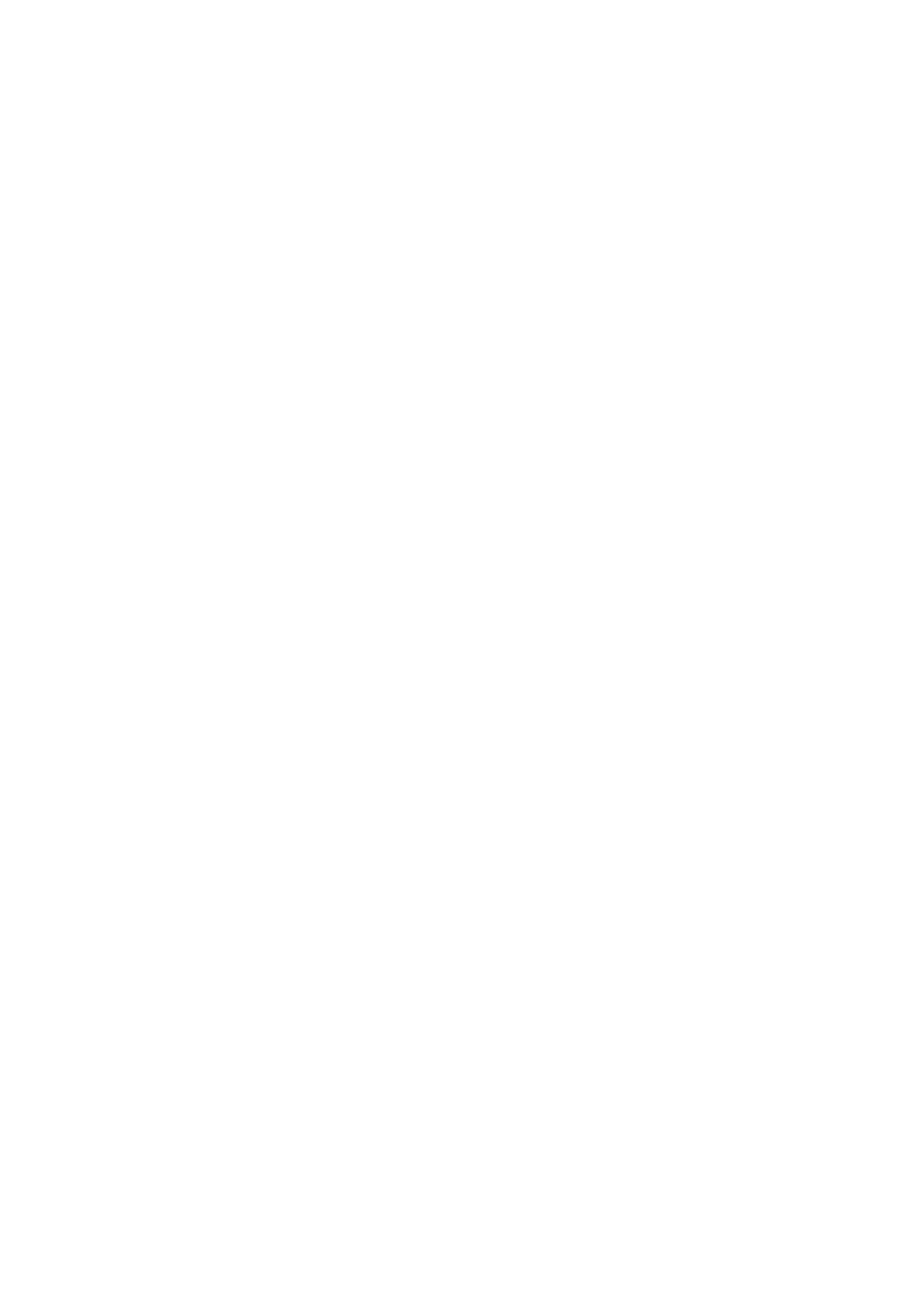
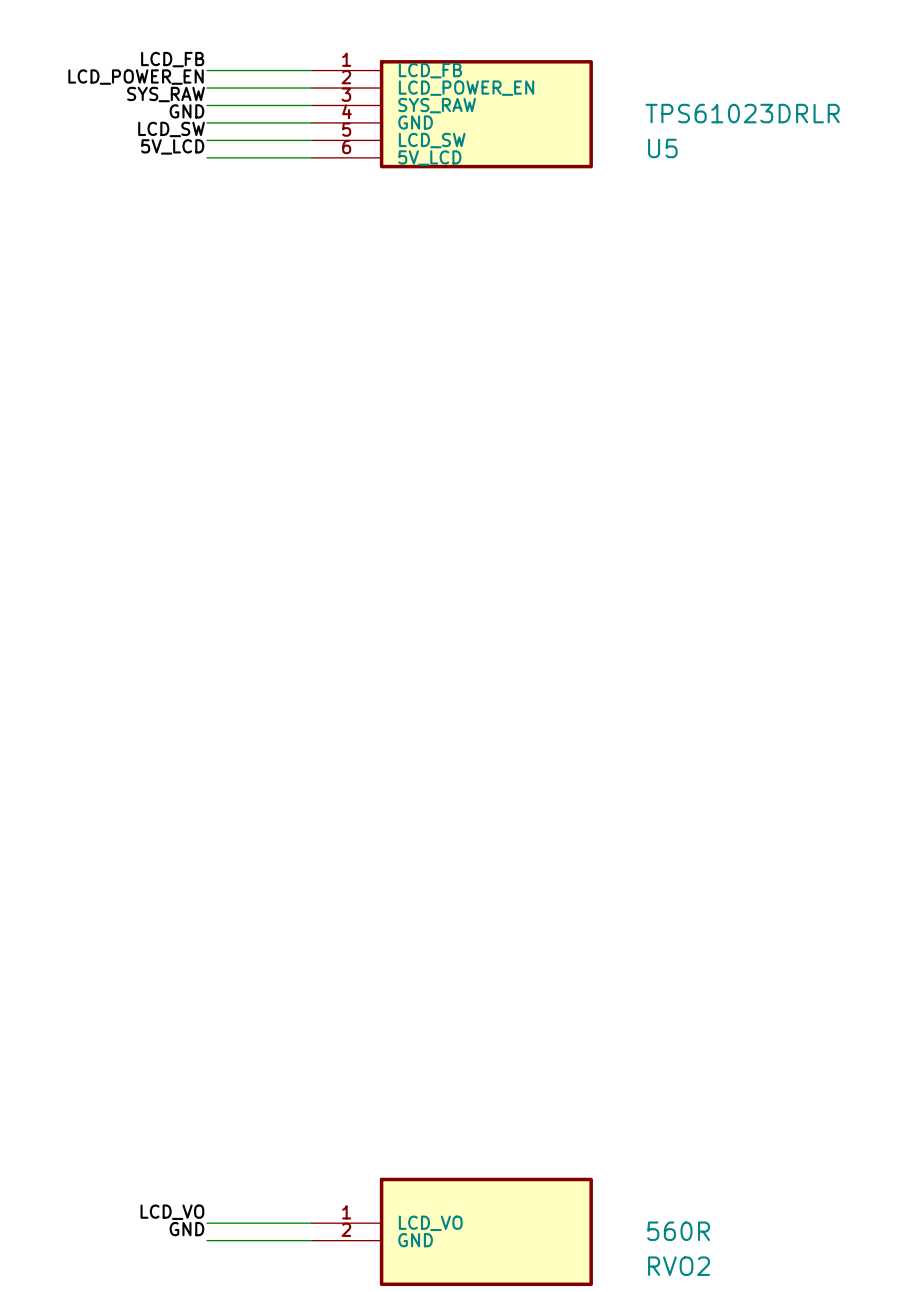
label: none -> LCD_FB (172, 59)
wire: none -> (206, 70) (311, 70)
label: none -> LCD_POWER_EN (136, 77)
wire: none -> (206, 88) (311, 88)
label: none -> SYS_RAW (166, 94)
wire: none -> (206, 105) (311, 105)
label: none -> GND (186, 111)
U5: none -> TPS61023DRLR (452, 114)
wire: none -> (206, 122) (311, 122)
label: none -> LCD_SW (171, 129)
wire: none -> (206, 140) (311, 140)
label: none -> 5V_LCD (172, 146)
wire: none -> (206, 157) (311, 157)
label: none -> LCD_VO (172, 1212)
wire: none -> (206, 1223) (311, 1223)
label: none -> GND (186, 1229)
RVO2: none -> 560R (452, 1231)
wire: none -> (206, 1240) (311, 1240)

